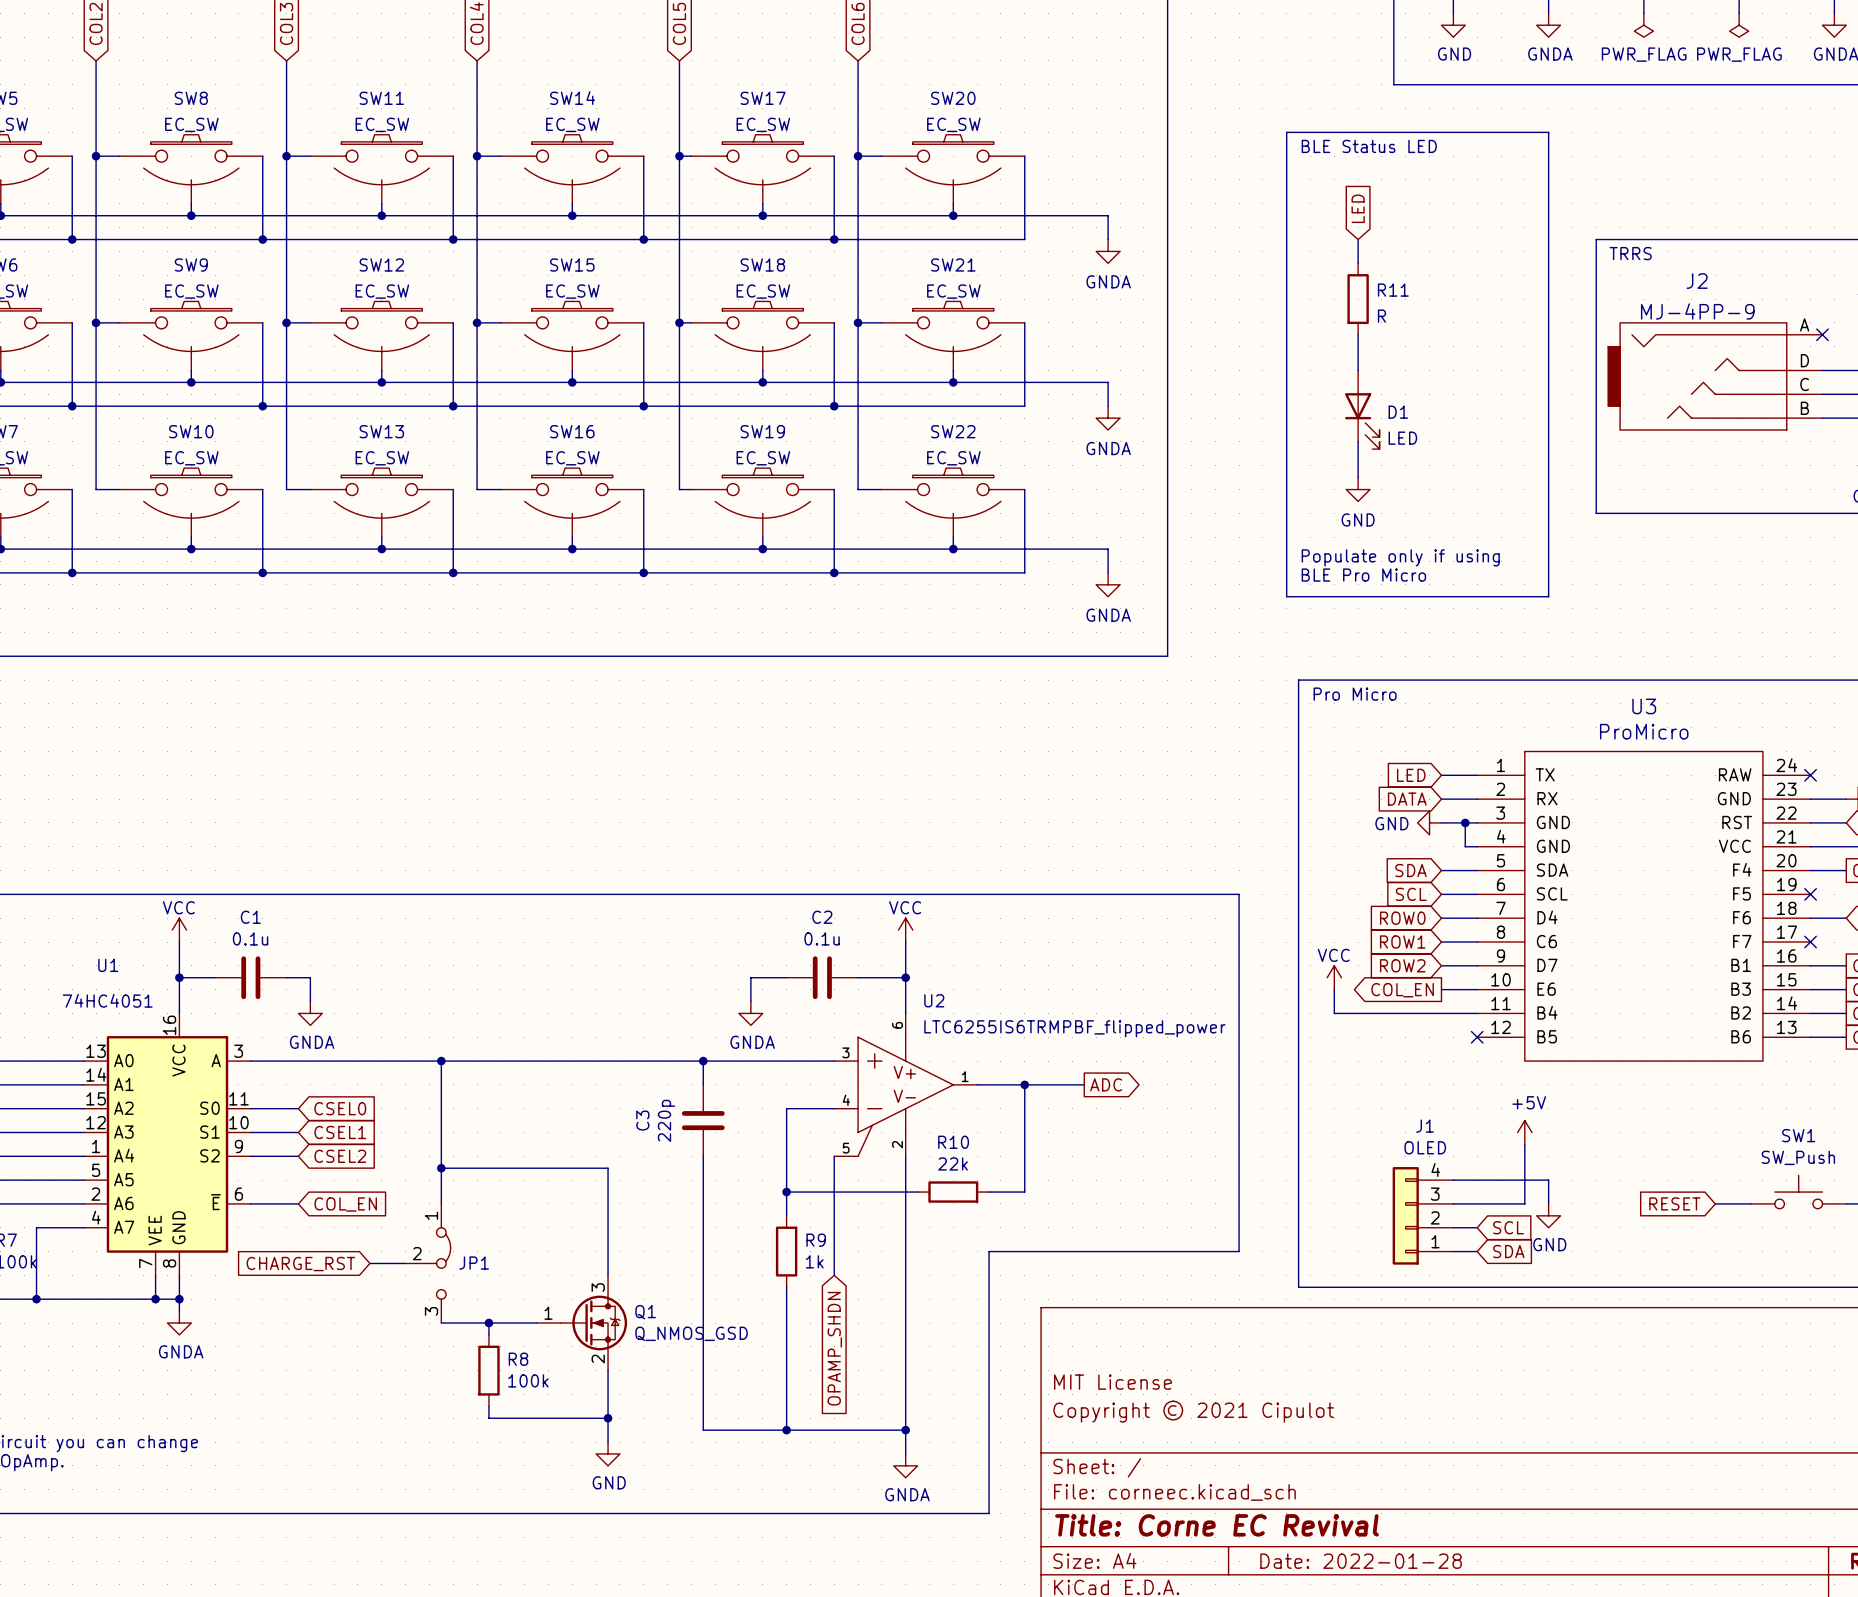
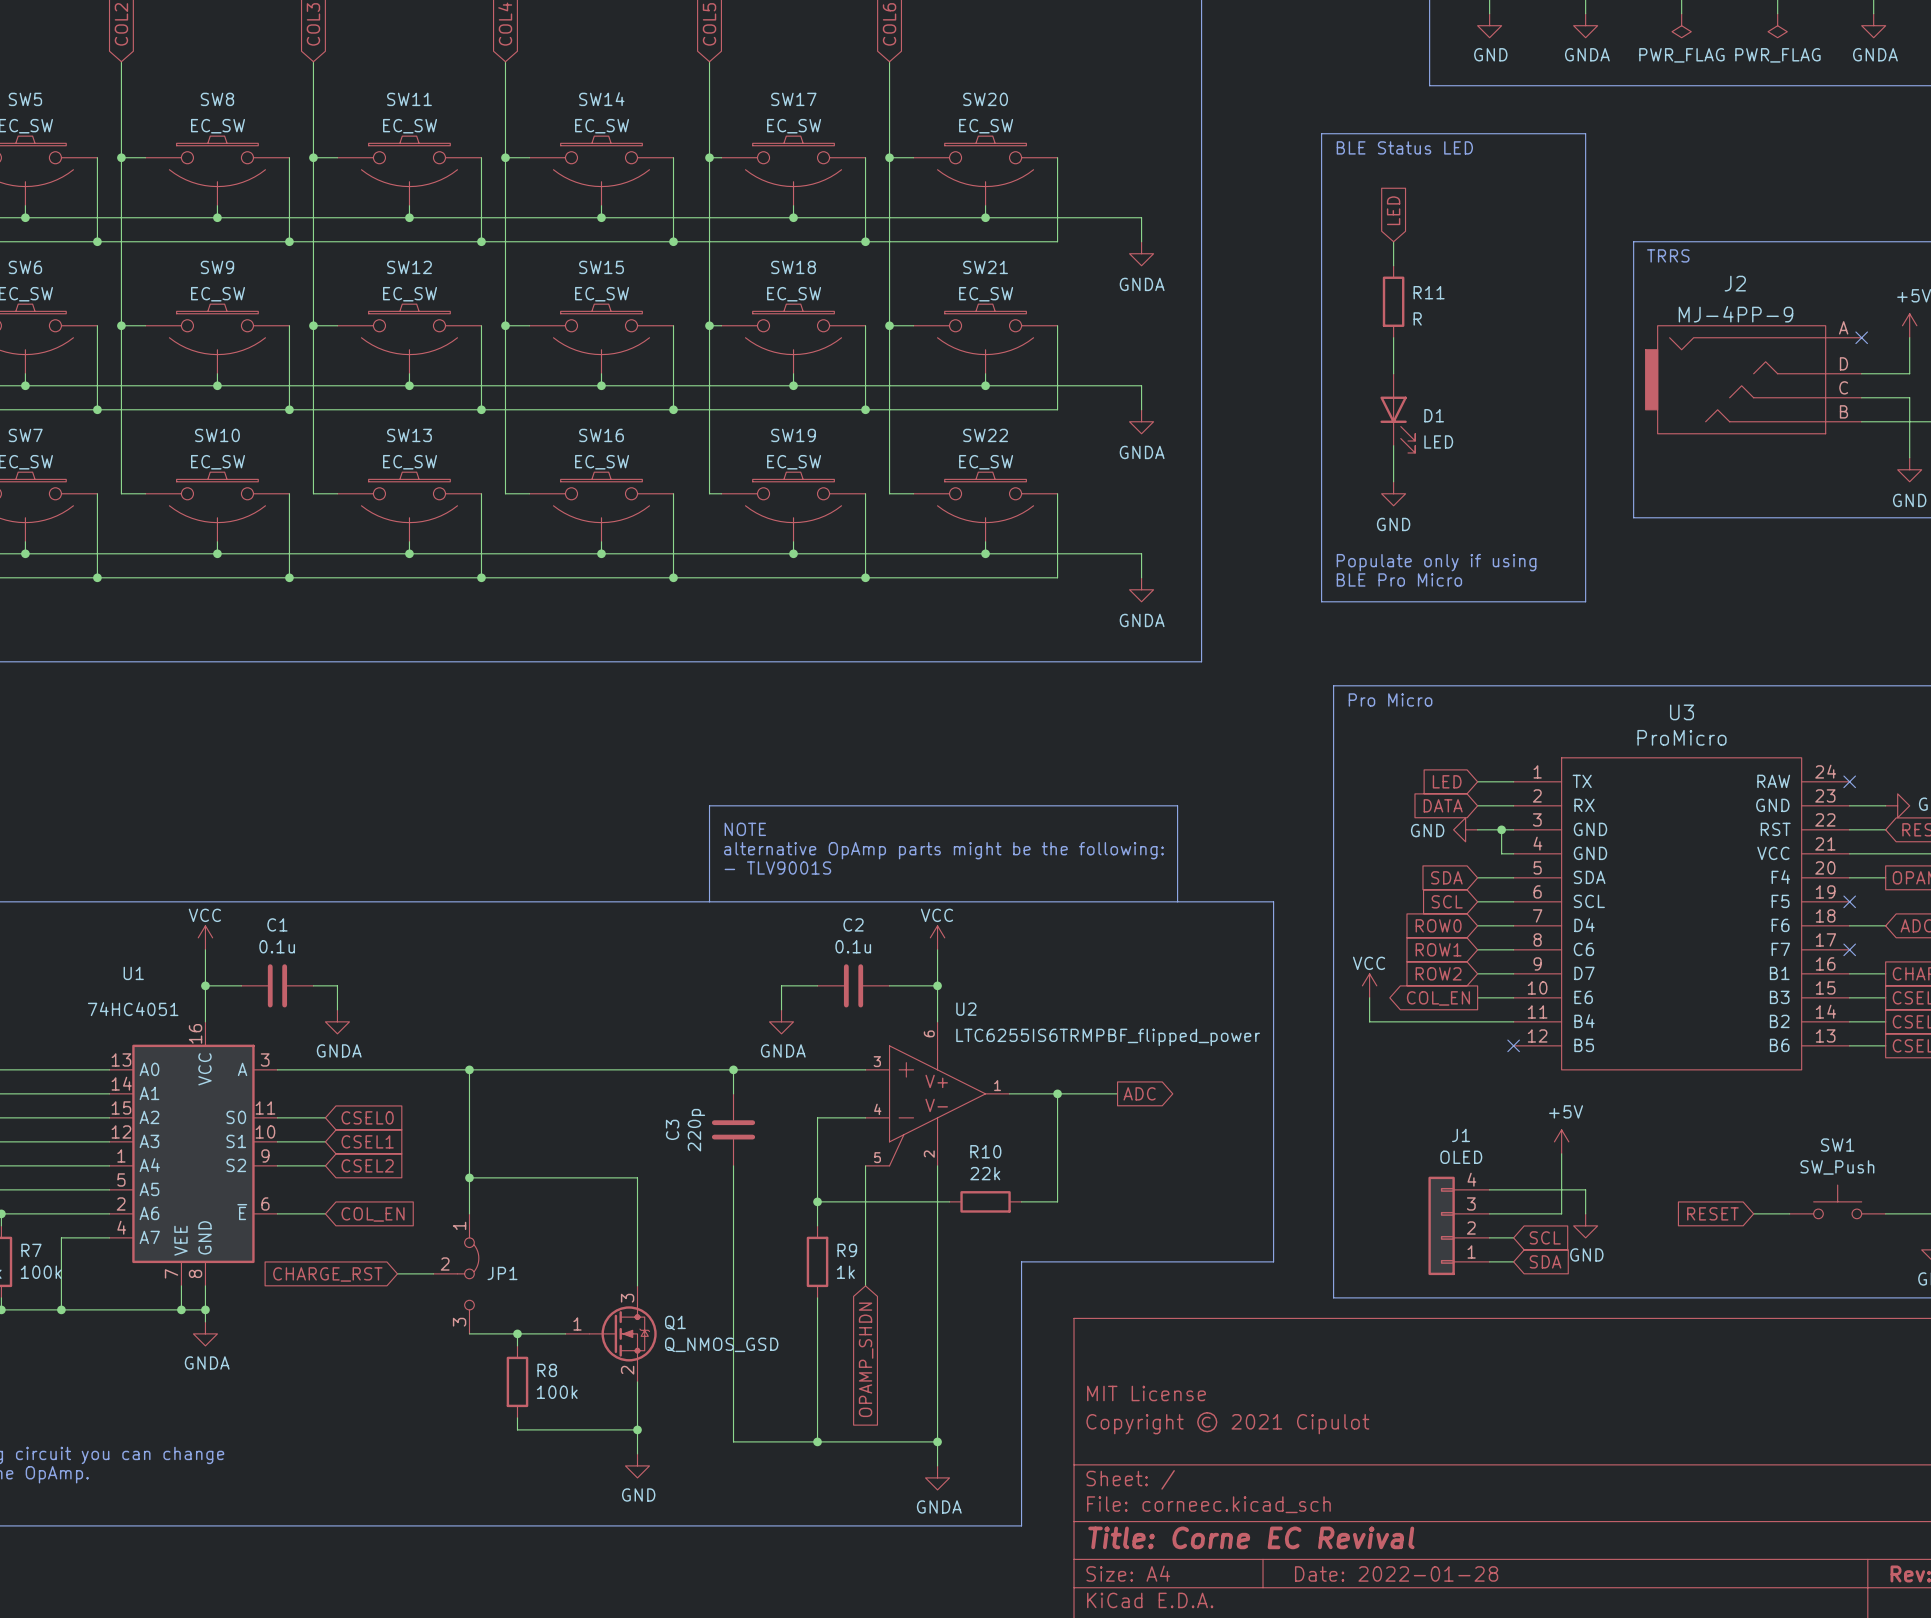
text: none -> NOTE (745, 829)
text: none -> alternative OpAmp parts might be the following: (943, 850)
text: none -> - TLV9001S (777, 868)
line: none -> (709, 901) (709, 805) (1177, 805) (1177, 901)

